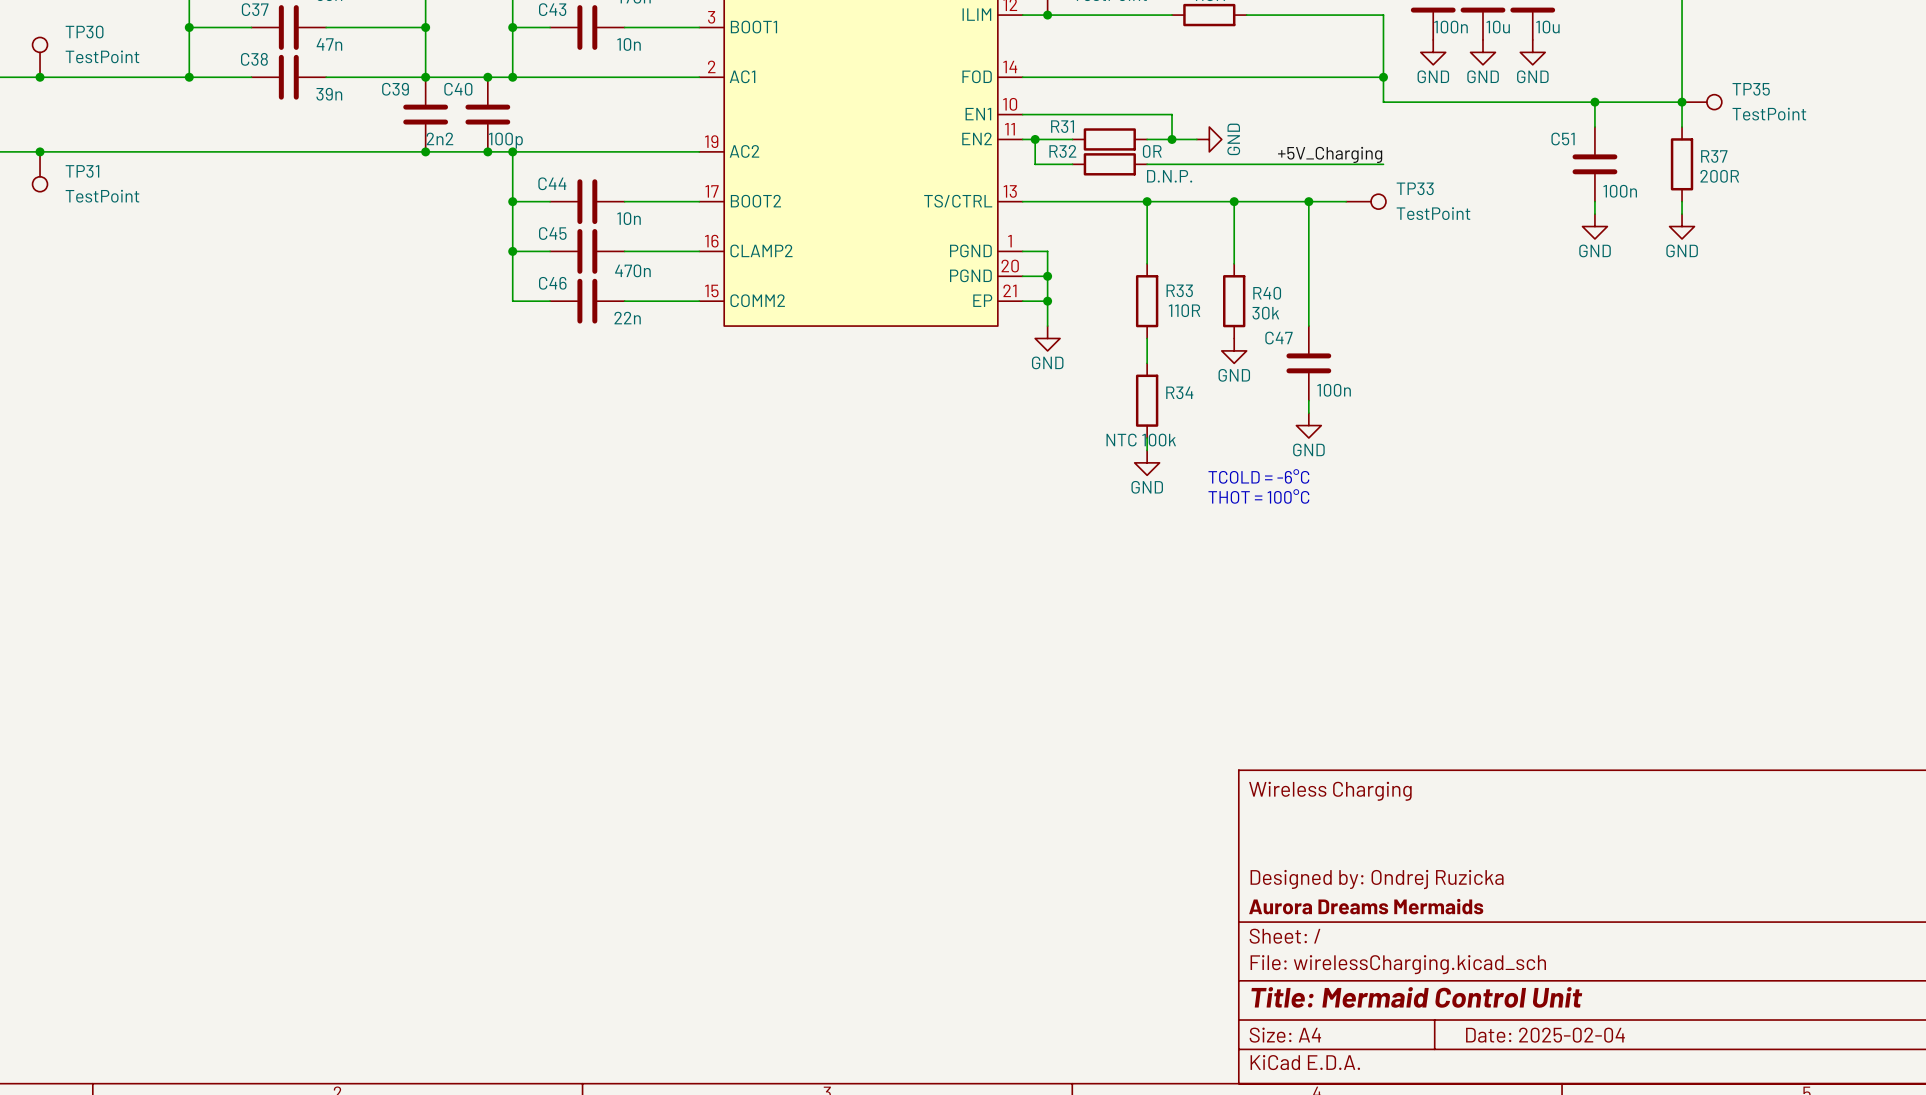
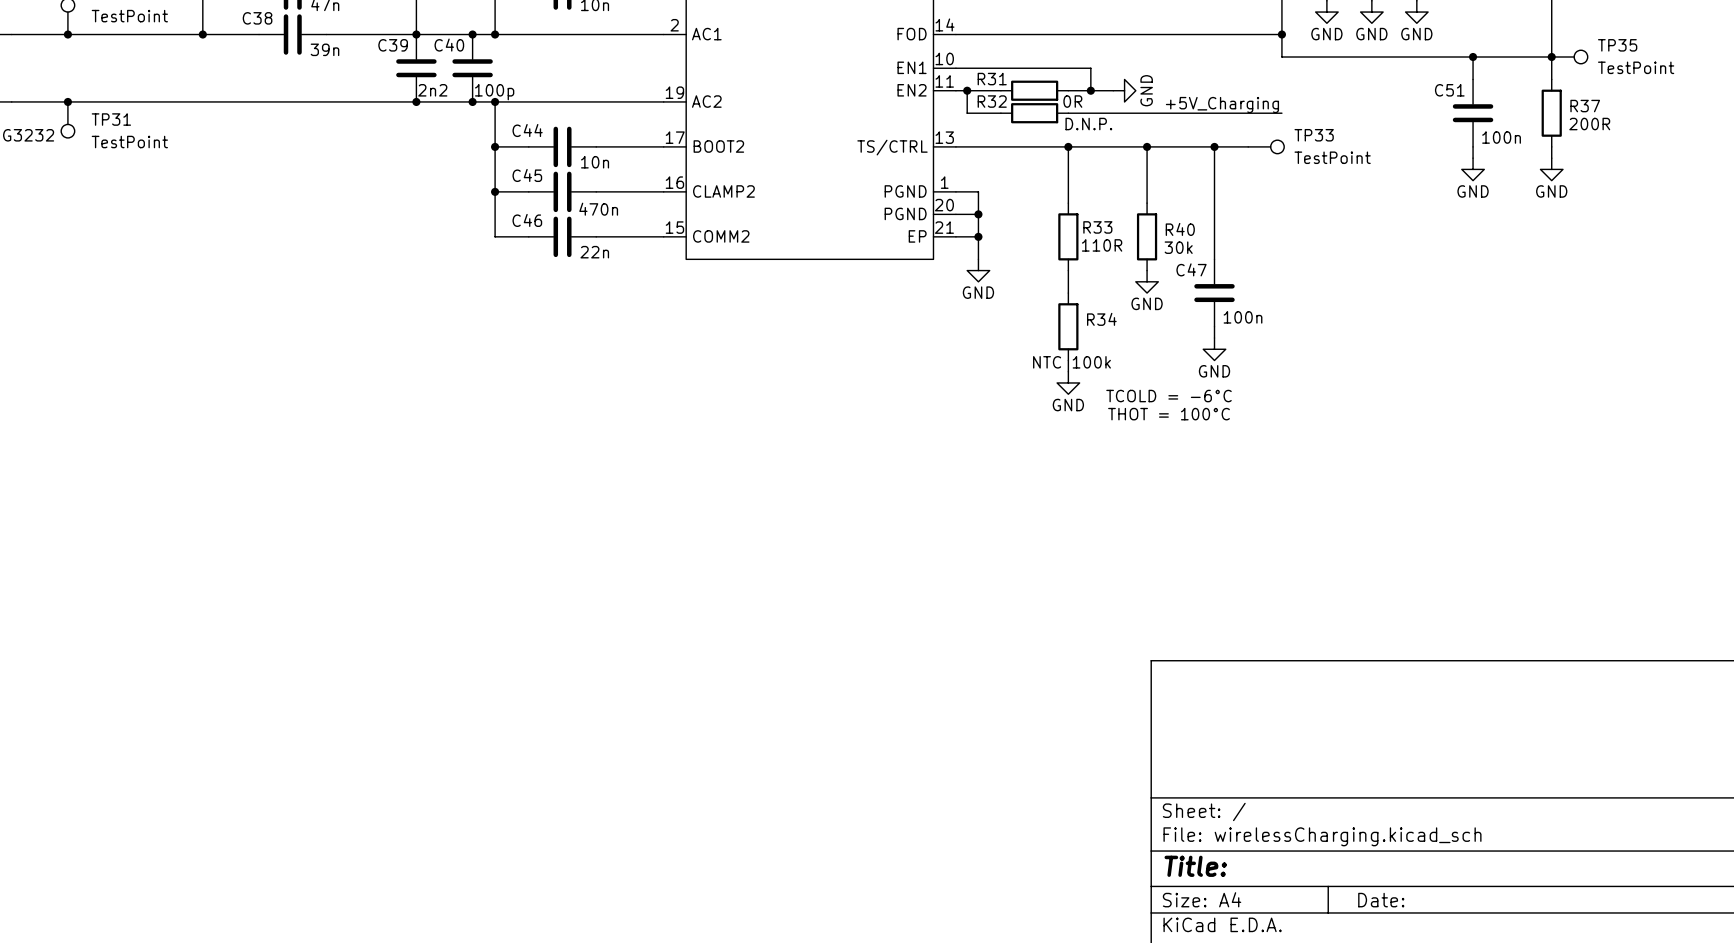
title block: Wireless Charging (1330, 791) -> none
title block: Designed by: Ondrej Ruzicka (1377, 879) -> none
title block: Aurora Dreams Mermaids (1366, 906) -> none
title block: Title: Mermaid Control Unit (1416, 997) -> Title: (1195, 866)
title block: Date: 2025-02-04 (1545, 1035) -> Date: (1381, 900)

